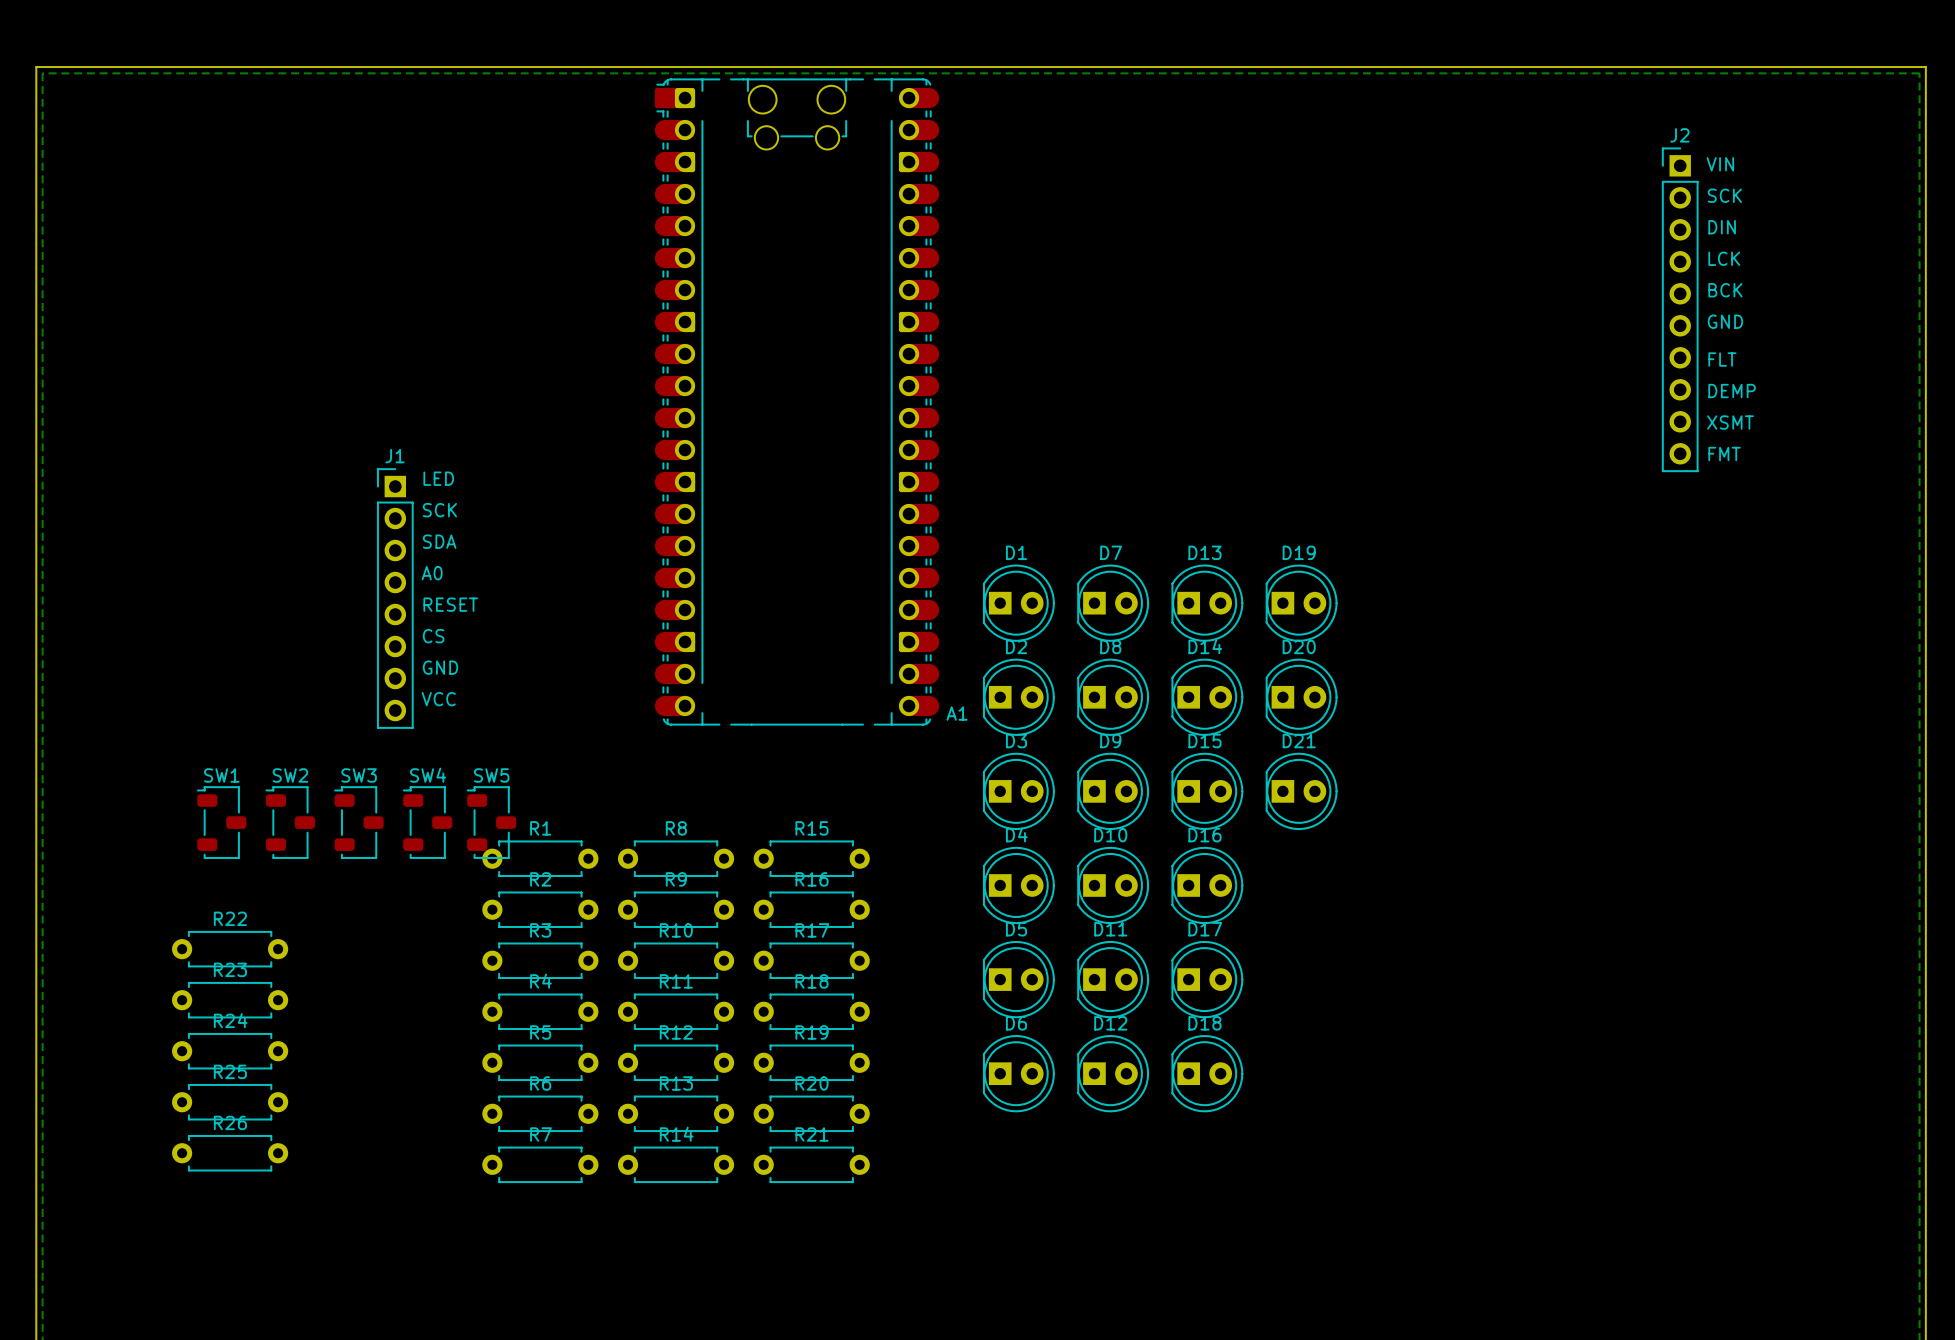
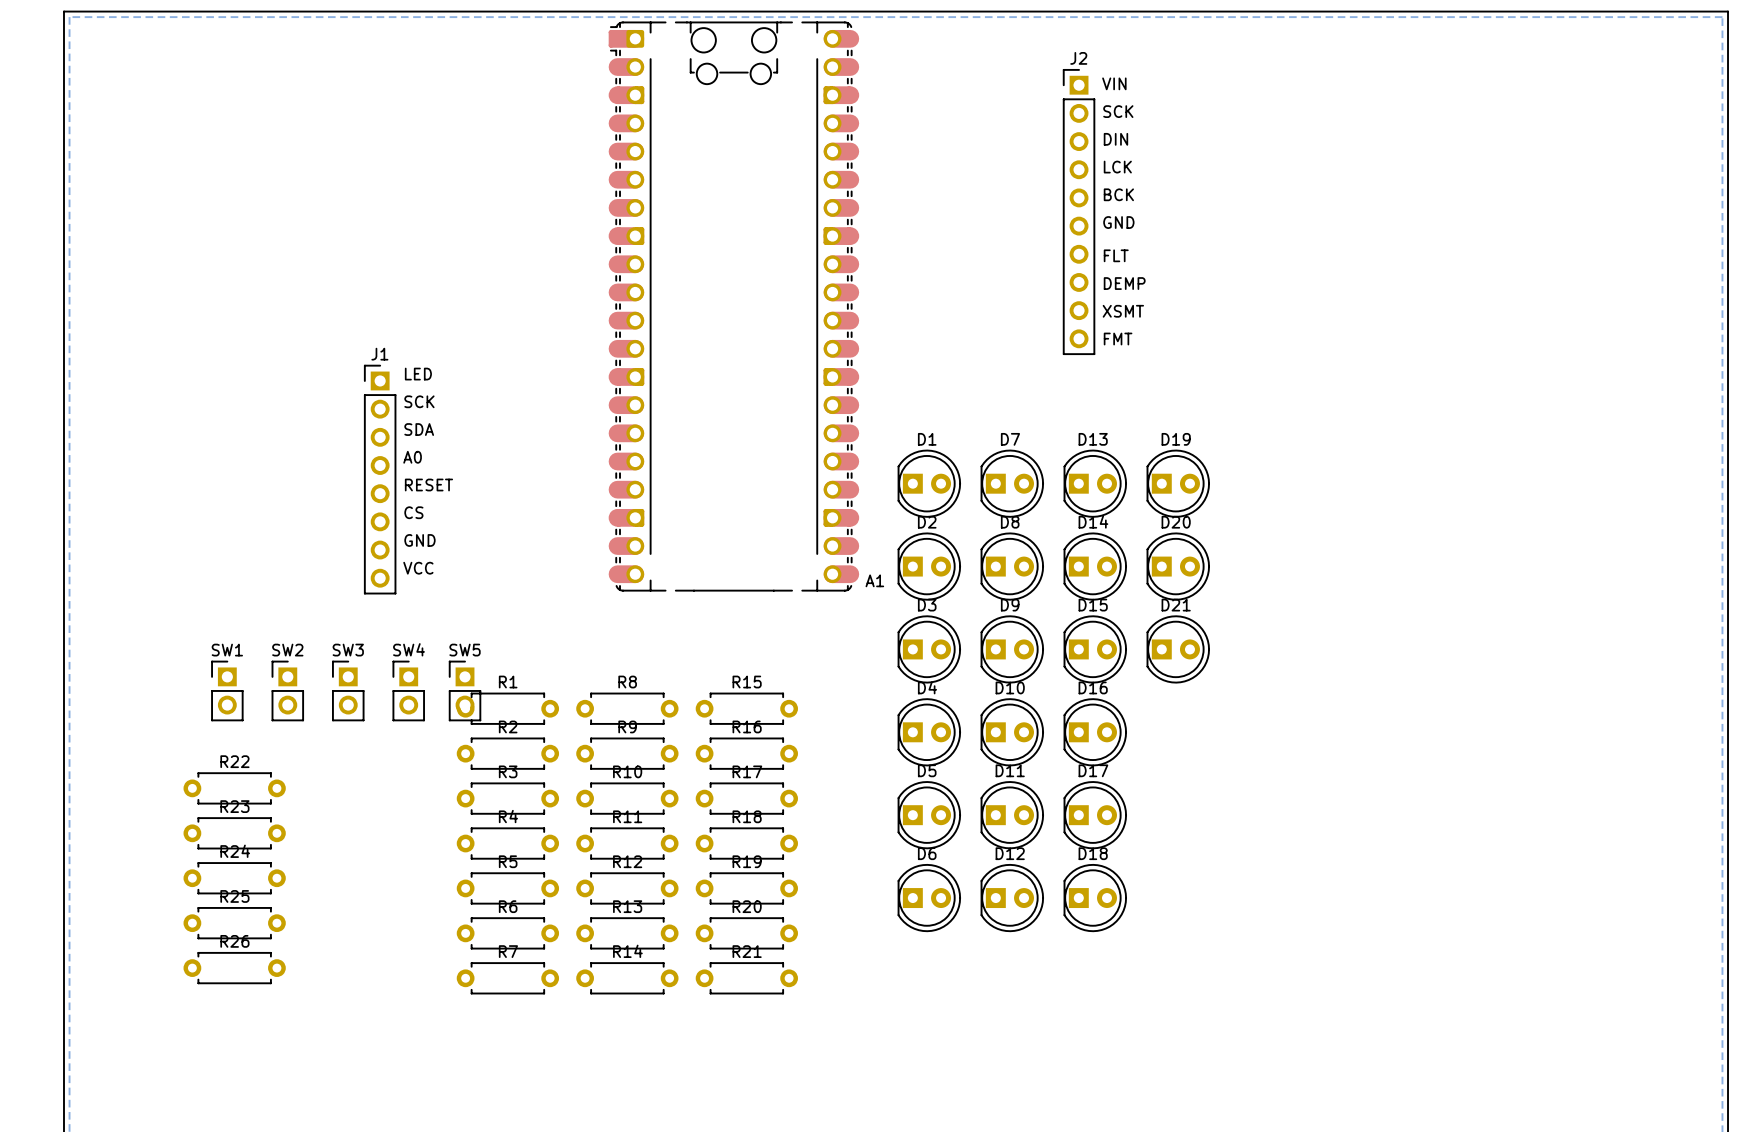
J2 position: (1680, 309) -> (1079, 212)
SW1 footprint: [197, 786, 247, 859] -> [211, 660, 244, 722]
SW2 footprint: [265, 786, 316, 859] -> [271, 660, 304, 722]
SW3 footprint: [334, 786, 384, 859] -> [332, 660, 365, 722]
SW4 footprint: [403, 786, 453, 859] -> [392, 660, 425, 722]
SW5 footprint: [466, 786, 517, 859] -> [449, 660, 481, 722]

